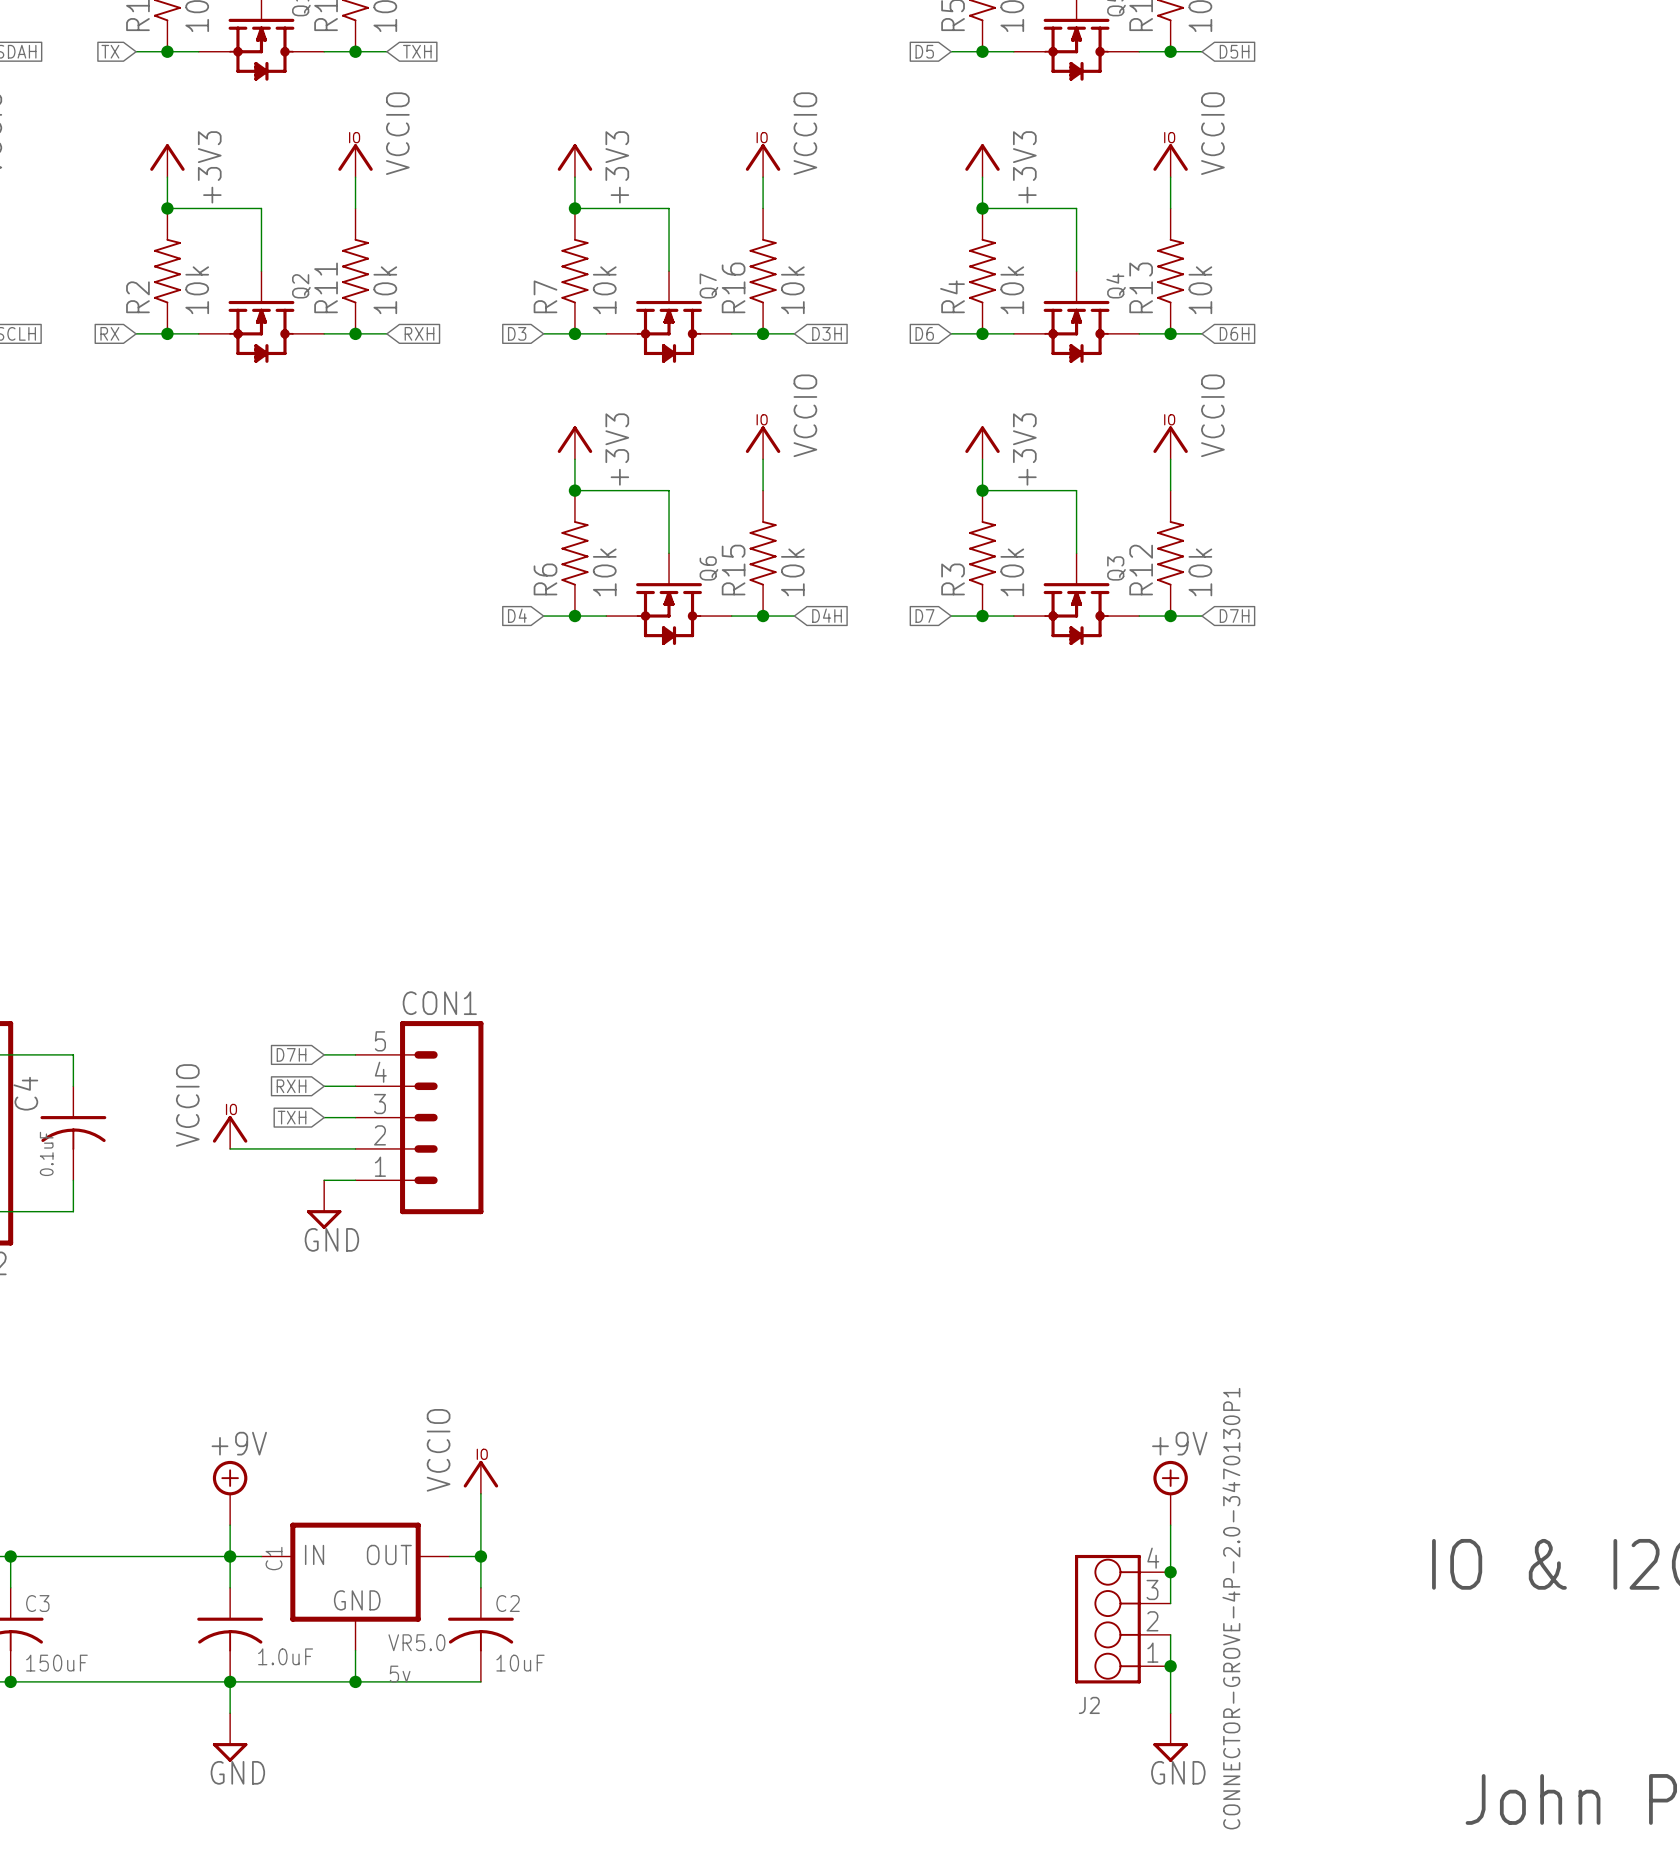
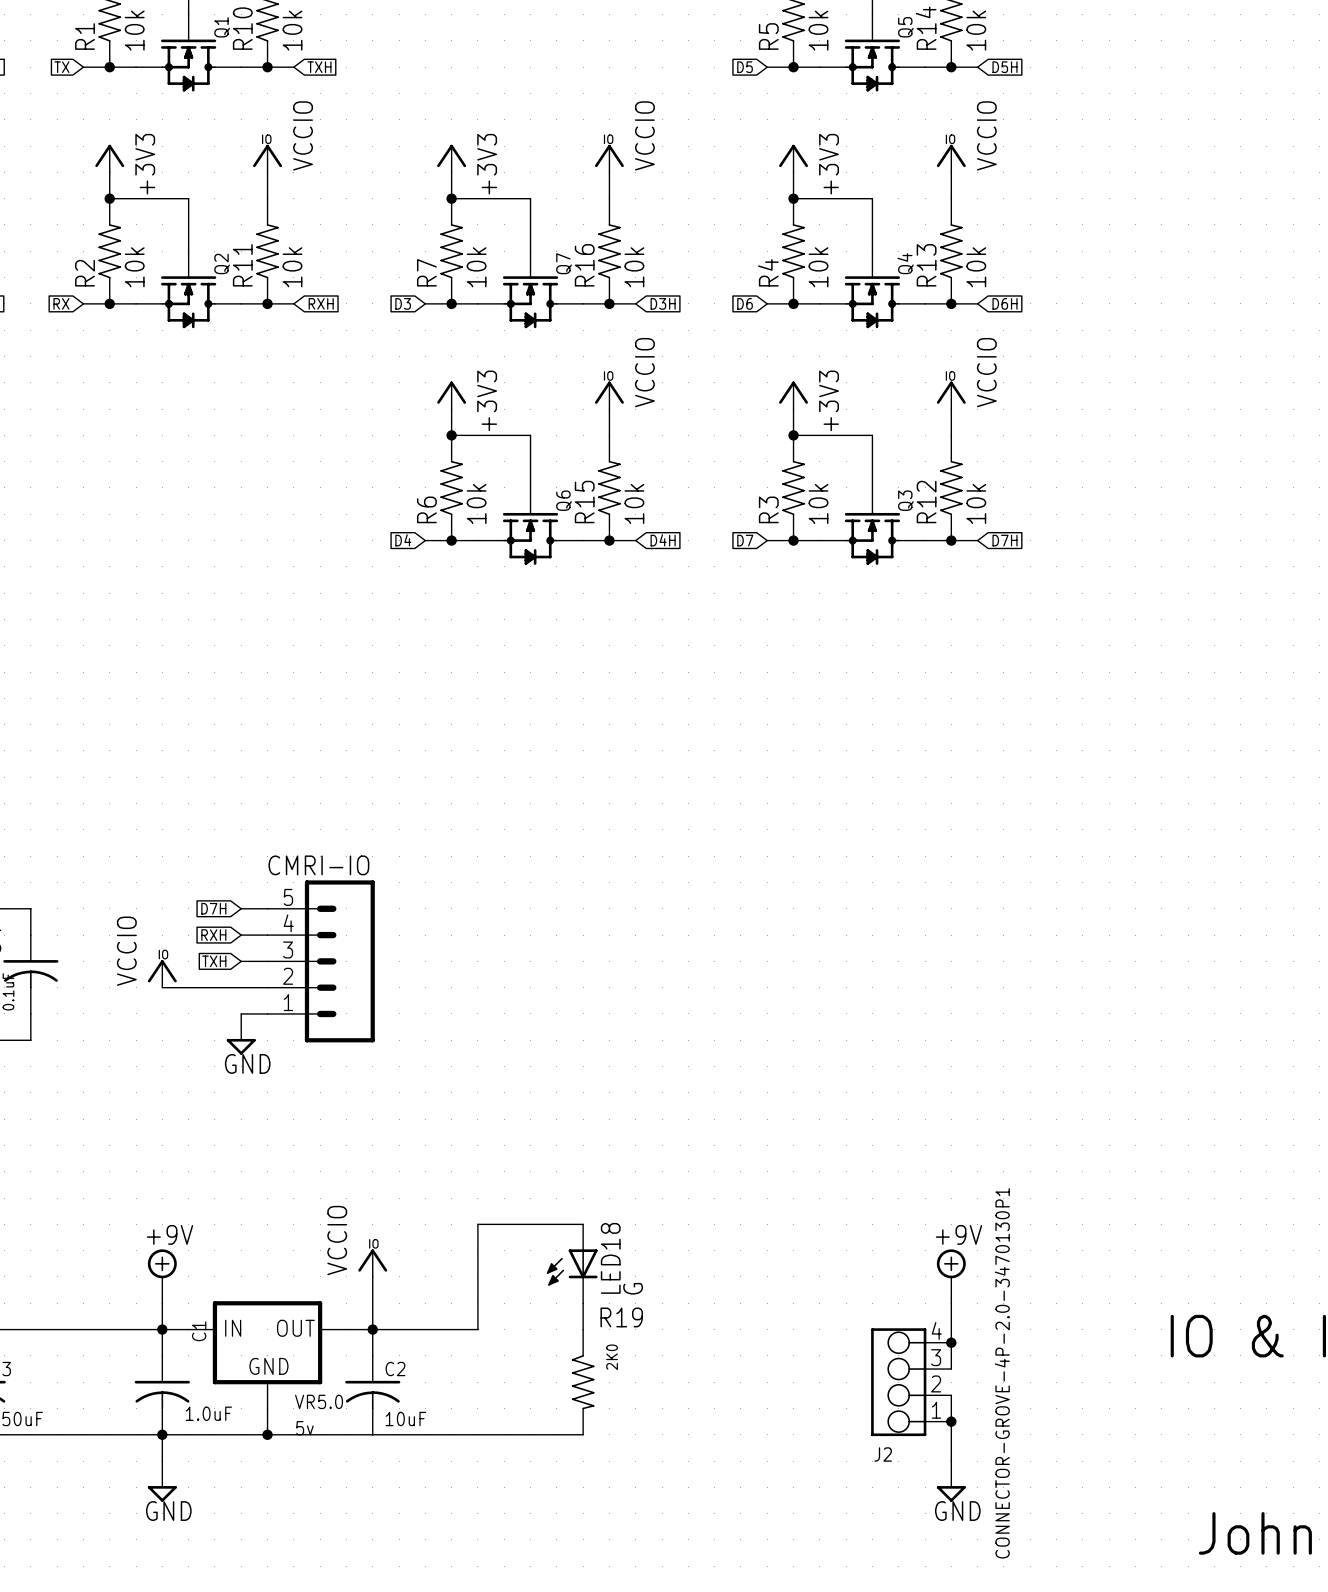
CON1 name: CON1 (439, 1003) -> CMRI-IO (318, 865)
wire: none -> (583, 1224) (477, 1224) (477, 1329) (372, 1329)
LED18: none -> G (572, 1263)
wire: none -> (583, 1303) (583, 1329)
R19: none -> 2K0 (583, 1382)
wire: none -> (372, 1434) (583, 1434)

